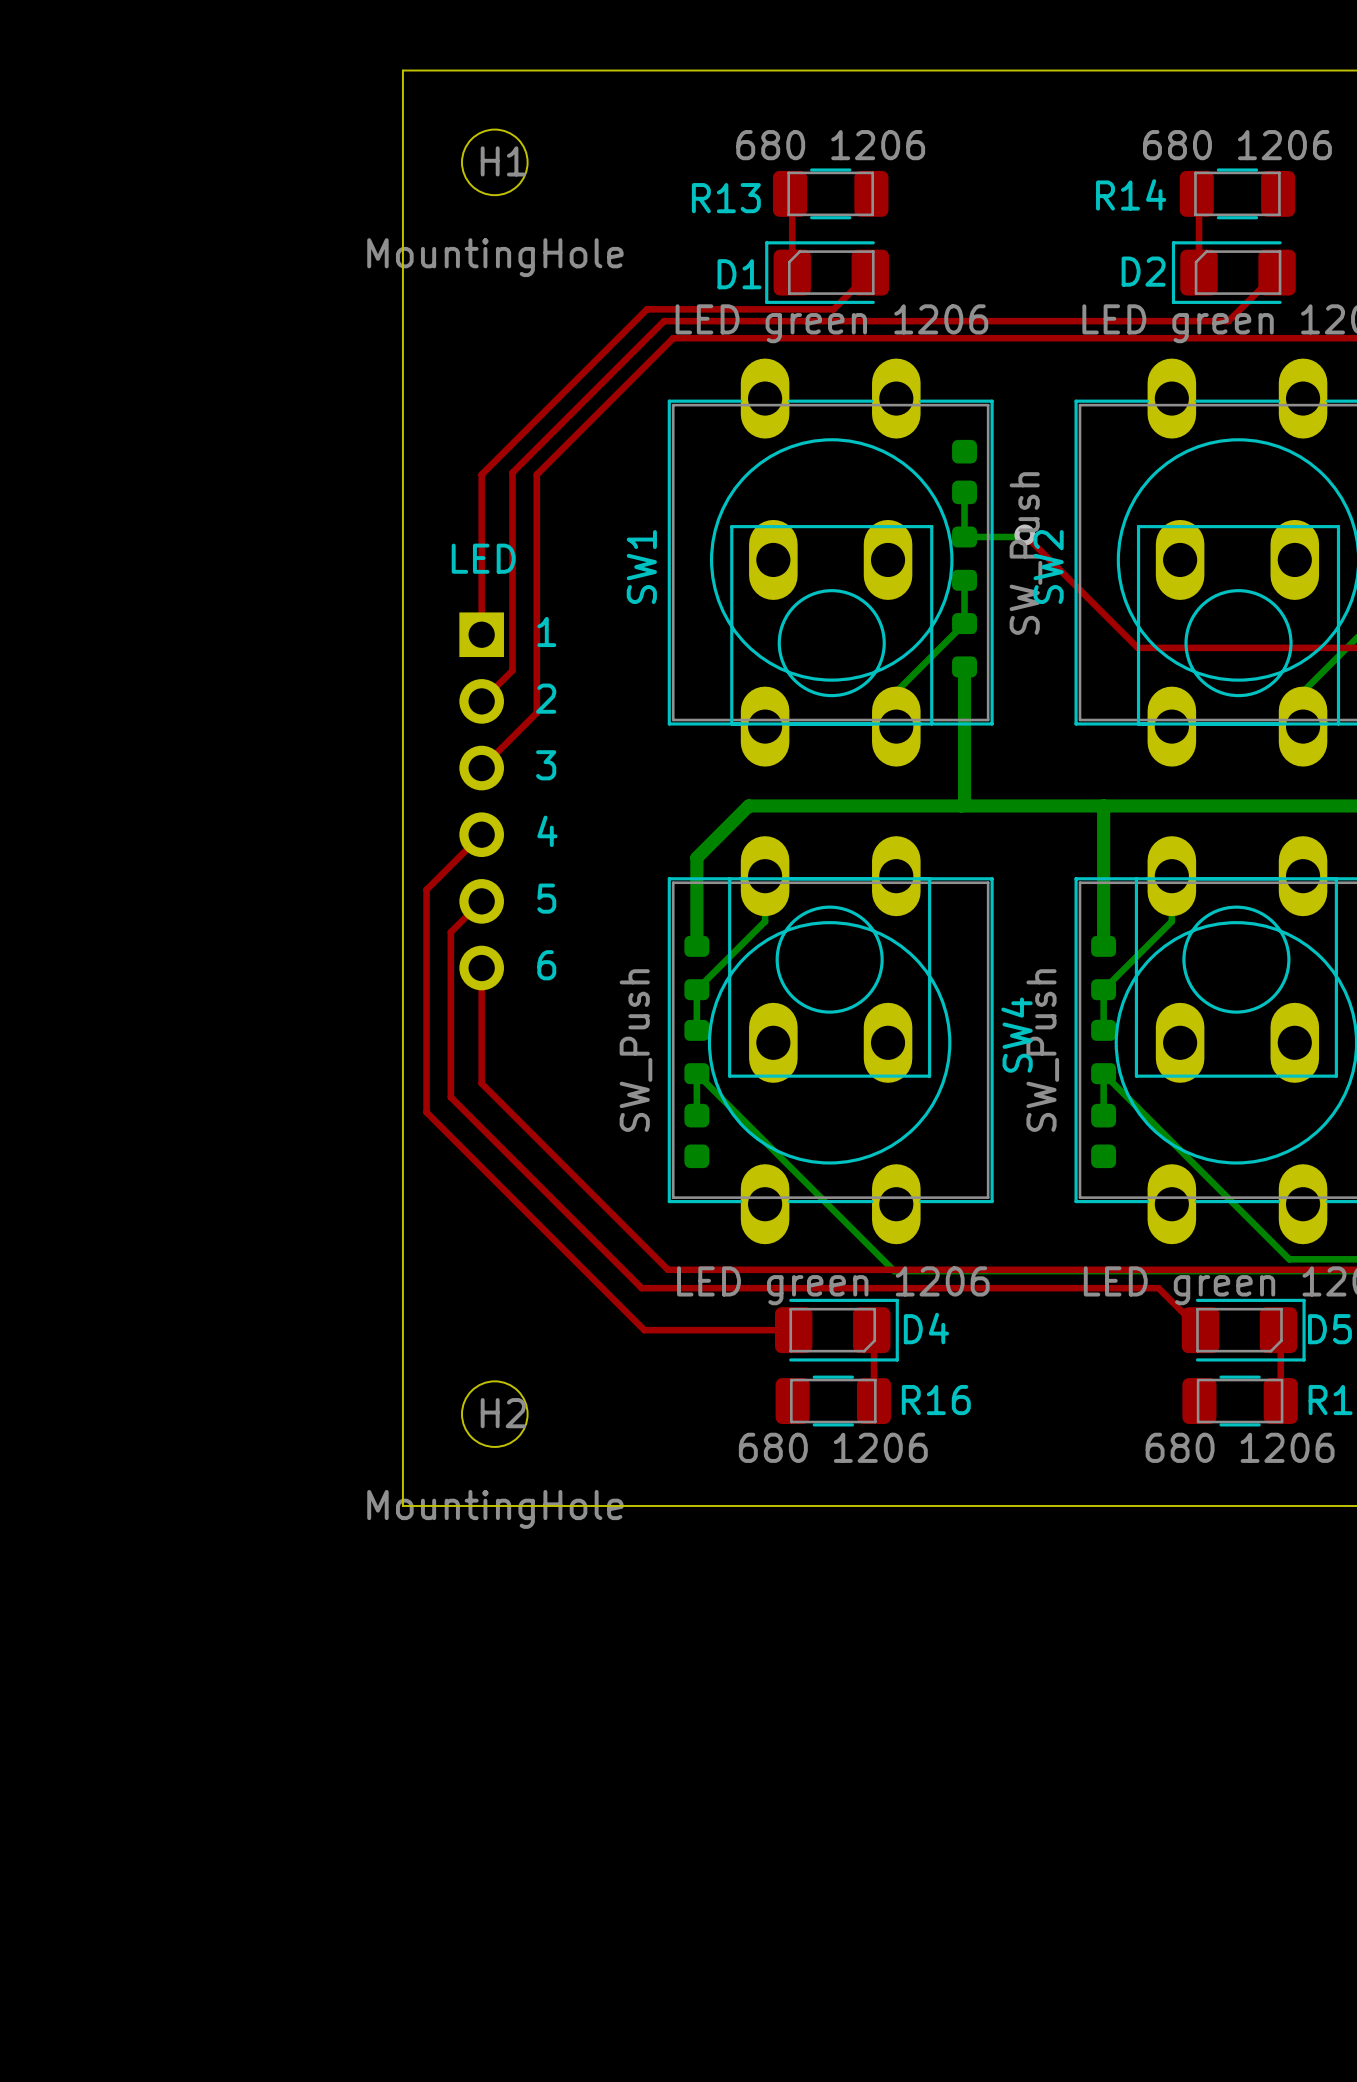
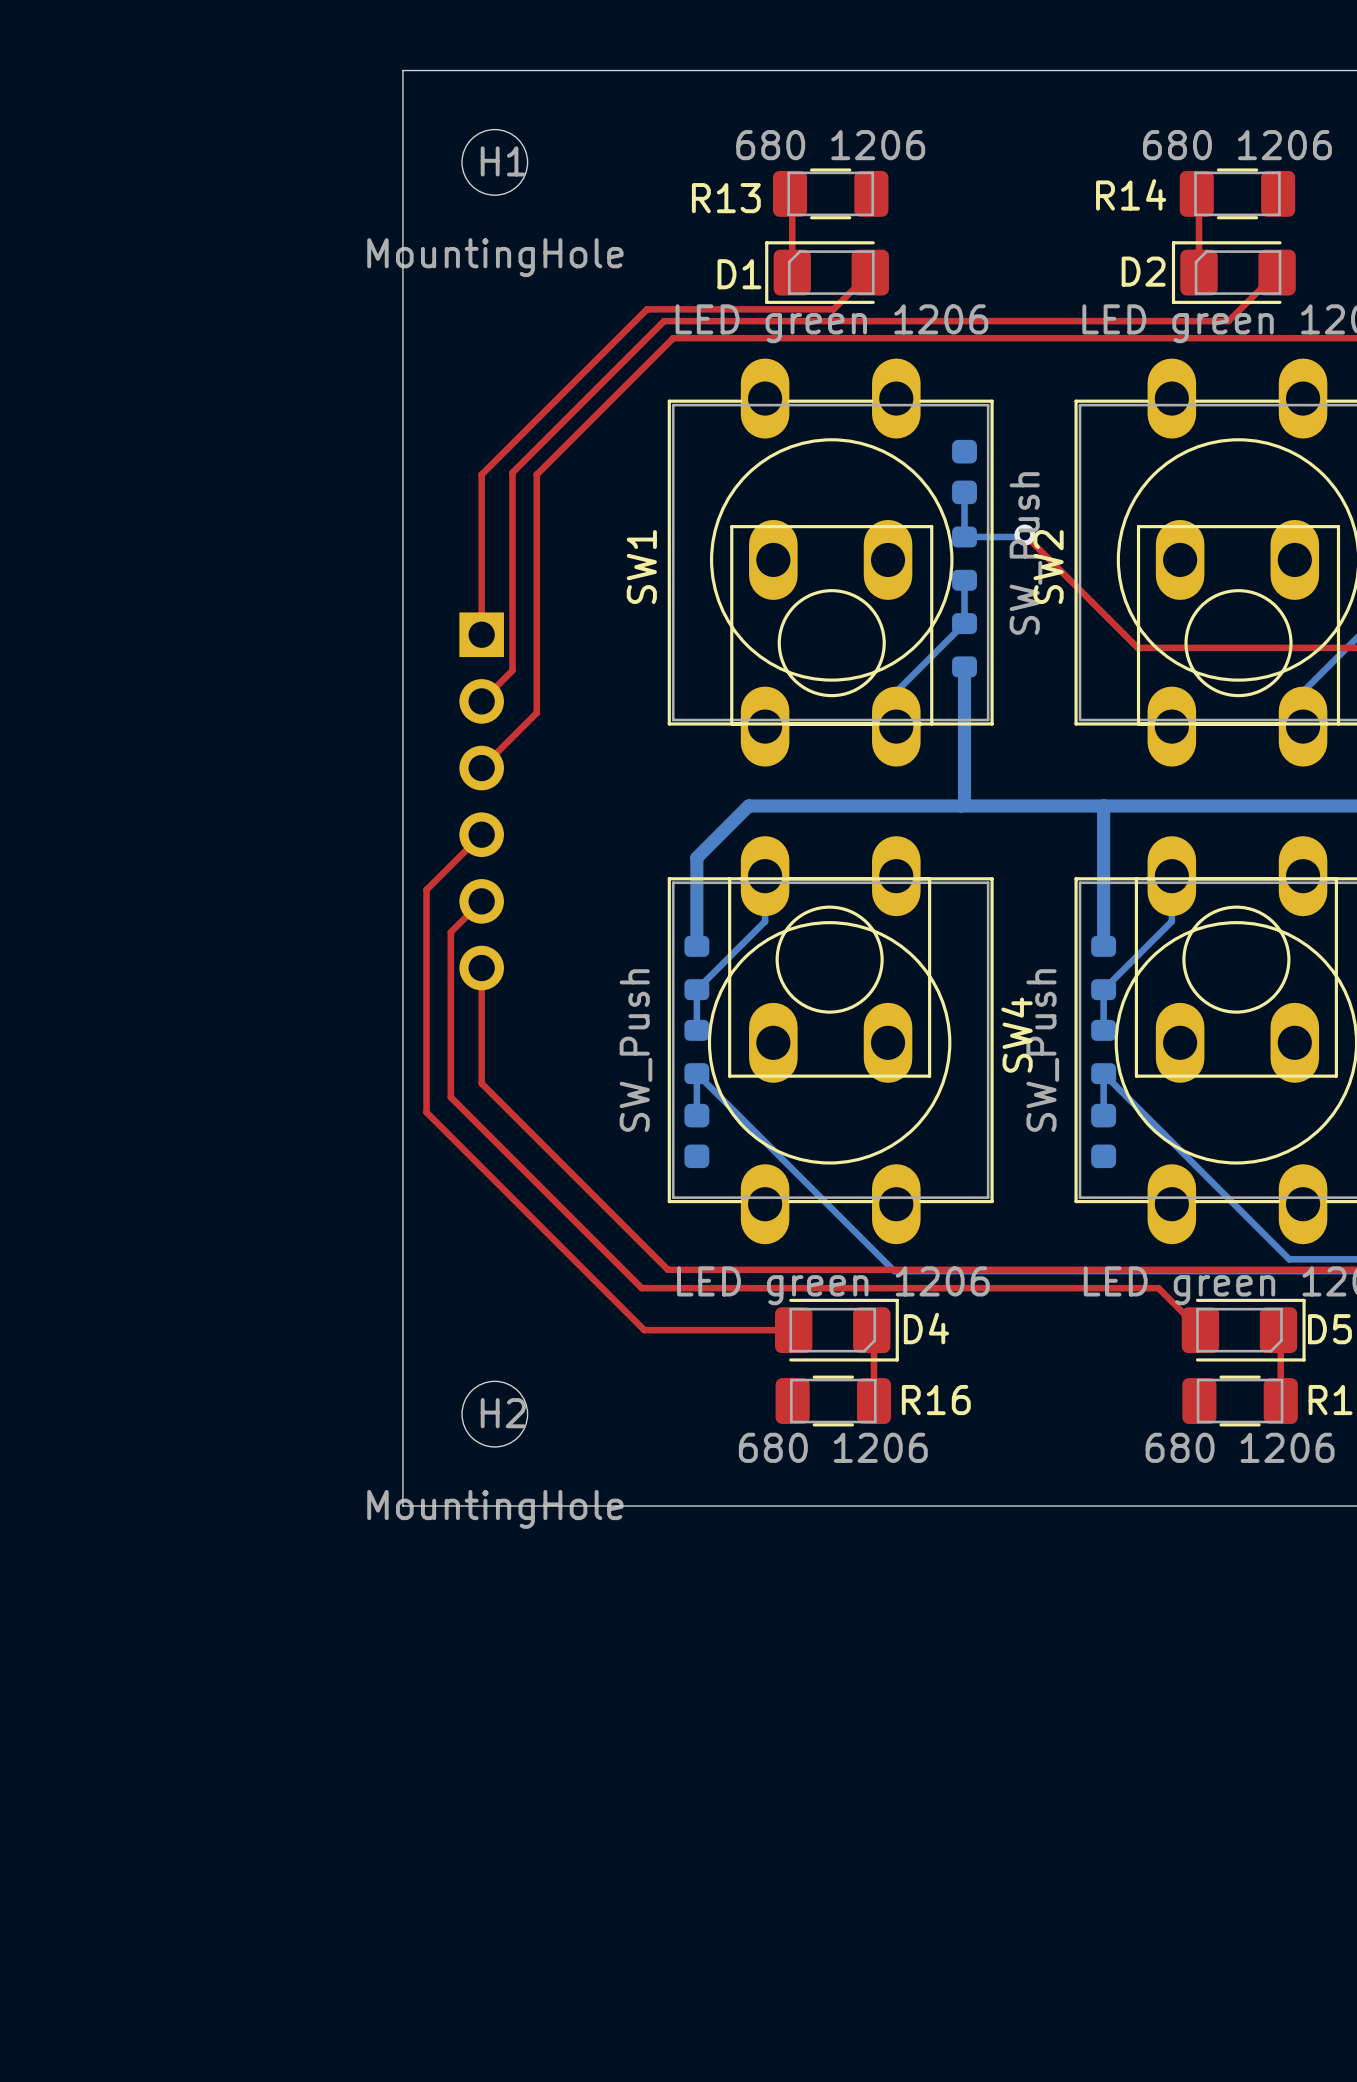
text: LED (483, 558) -> none
text: 1 (546, 631) -> none
text: 2 (546, 698) -> none
text: 3 (546, 765) -> none
text: 4 (547, 831) -> none
text: 5 (546, 898) -> none
text: 6 (546, 965) -> none

